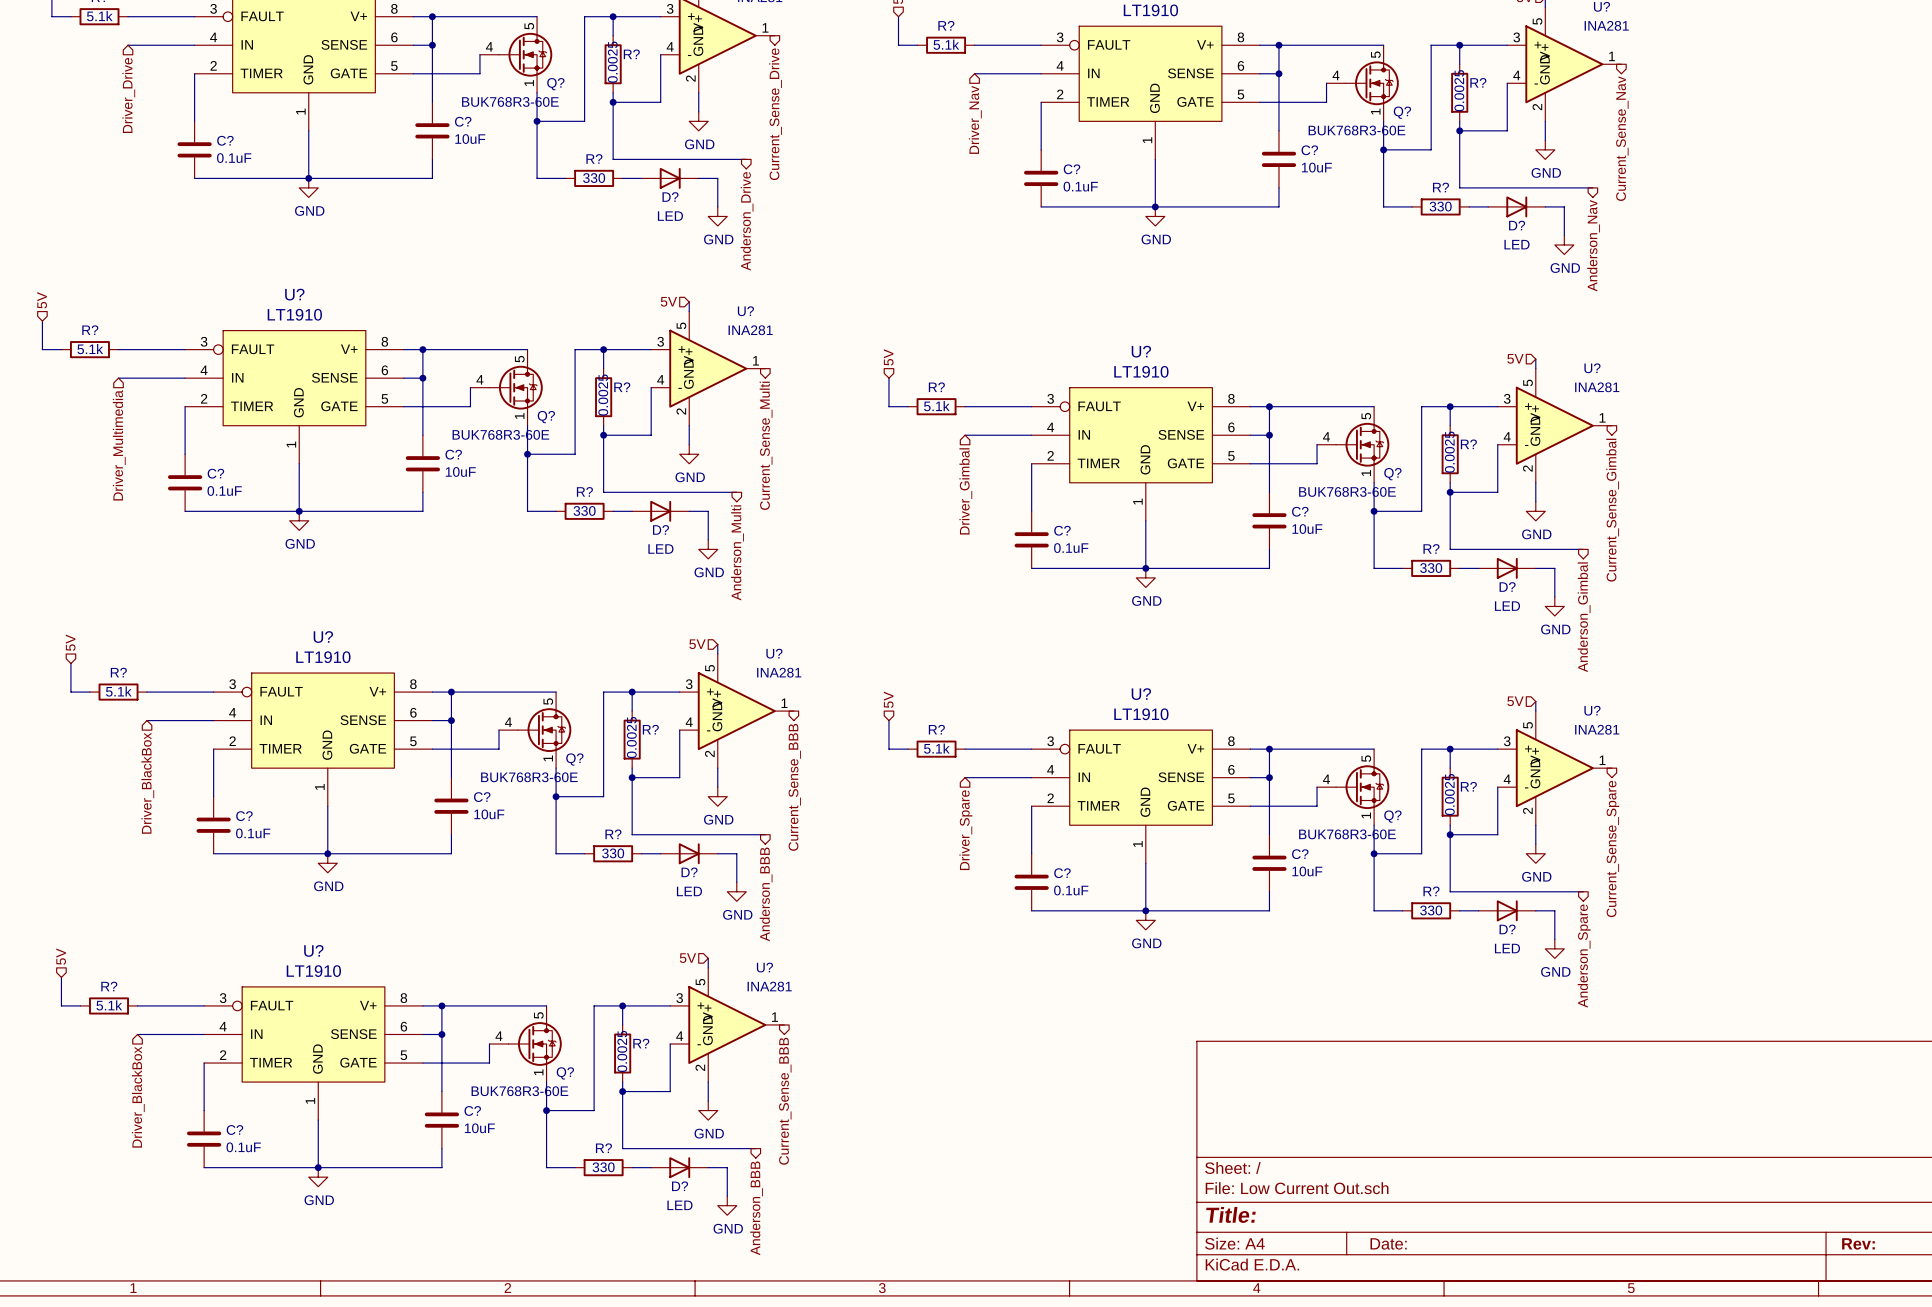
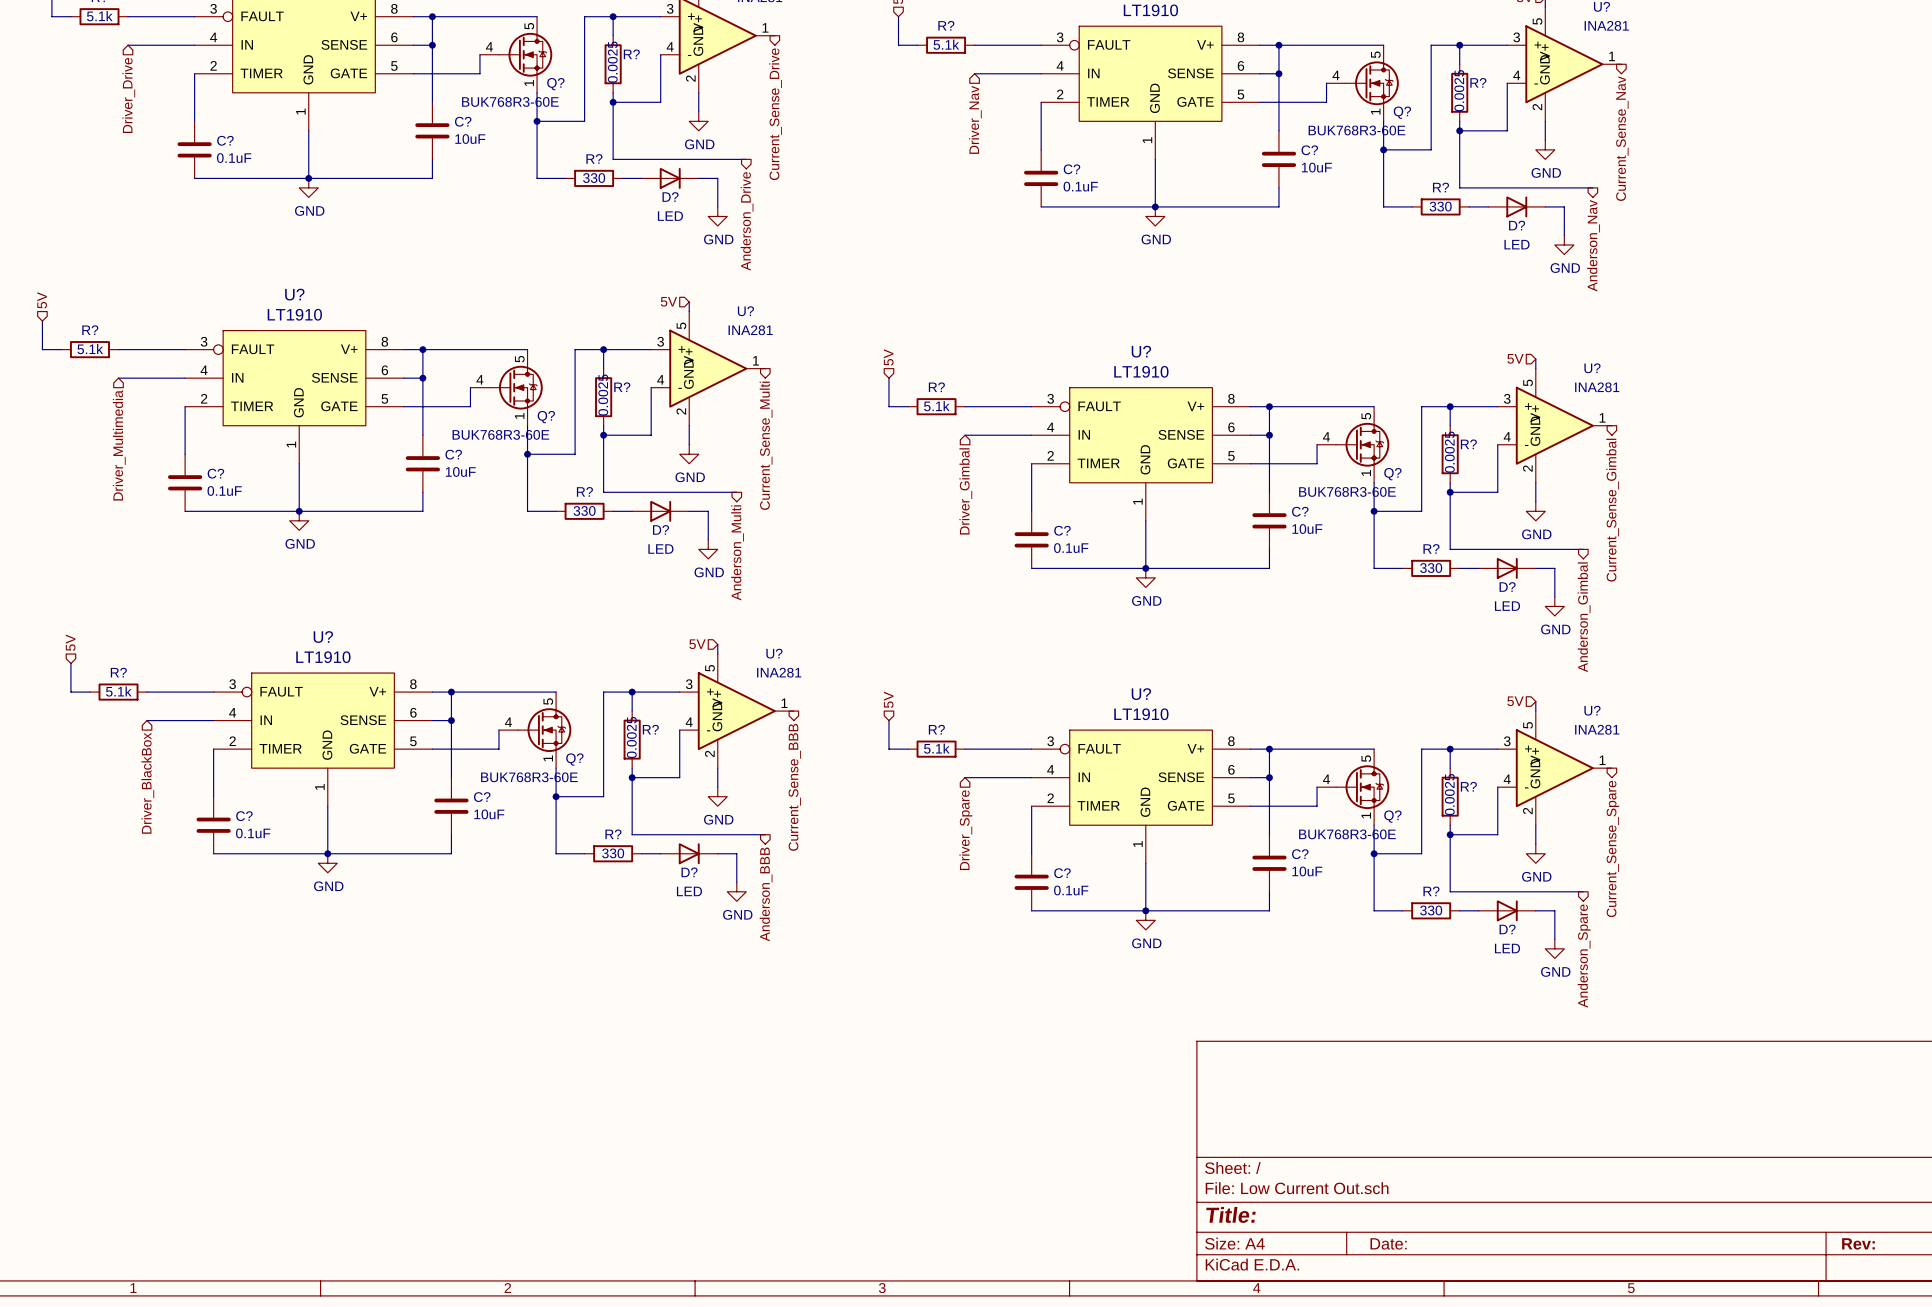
hierarchical label: 5V (61, 956) -> none
hierarchical label: 5V (687, 958) -> none
wire: (708, 958) (708, 967) -> none
wire: (61, 977) (61, 1005) (80, 1005) -> none
R?: 5.1k (109, 1005) -> none
wire: (137, 1005) (204, 1005) -> none
wire: (422, 1005) (546, 1005) -> none
wire: (441, 1005) (441, 1091) -> none
junction: (441, 1005) -> none
wire: (622, 1005) (622, 1024) -> none
junction: (622, 1005) -> none
wire: (670, 1005) (594, 1005) (594, 1110) (546, 1110) -> none
U?: INA281 (727, 1024) -> none
wire: (137, 1034) (204, 1034) -> none
wire: (422, 1034) (441, 1034) -> none
junction: (441, 1034) -> none
wire: (489, 1044) (489, 1063) (422, 1063) -> none
Q?: BUK768R3-60E (525, 1044) -> none
wire: (670, 1044) (670, 1091) (622, 1091) -> none
U?: LT1910 (313, 1053) -> none
R?: 0.0025 (622, 1053) -> none
wire: (204, 1063) (204, 1110) -> none
wire: (546, 1082) (546, 1167) (575, 1167) -> none
wire: (622, 1082) (622, 1148) (755, 1148) -> none
wire: (708, 1082) (708, 1101) -> none
junction: (622, 1091) -> none
hierarchical label: Driver_BlackBox (138, 1097) -> none
hierarchical label: Current_Sense_BBB (785, 1101) -> none
junction: (546, 1110) -> none
power symbol: GND (708, 1110) -> none
wire: (318, 1120) (318, 1167) -> none
C?: 10uF (441, 1120) -> none
C?: 0.1uF (204, 1139) -> none
wire: (441, 1148) (441, 1167) (204, 1167) -> none
junction: (318, 1167) -> none
R?: 330 (603, 1167) -> none
wire: (632, 1167) (651, 1167) -> none
D?: LED (679, 1167) -> none
wire: (708, 1167) (727, 1167) (727, 1196) -> none
power symbol: GND (318, 1177) -> none
power symbol: GND (727, 1205) -> none
hierarchical label: Anderson_BBB (756, 1208) -> none

